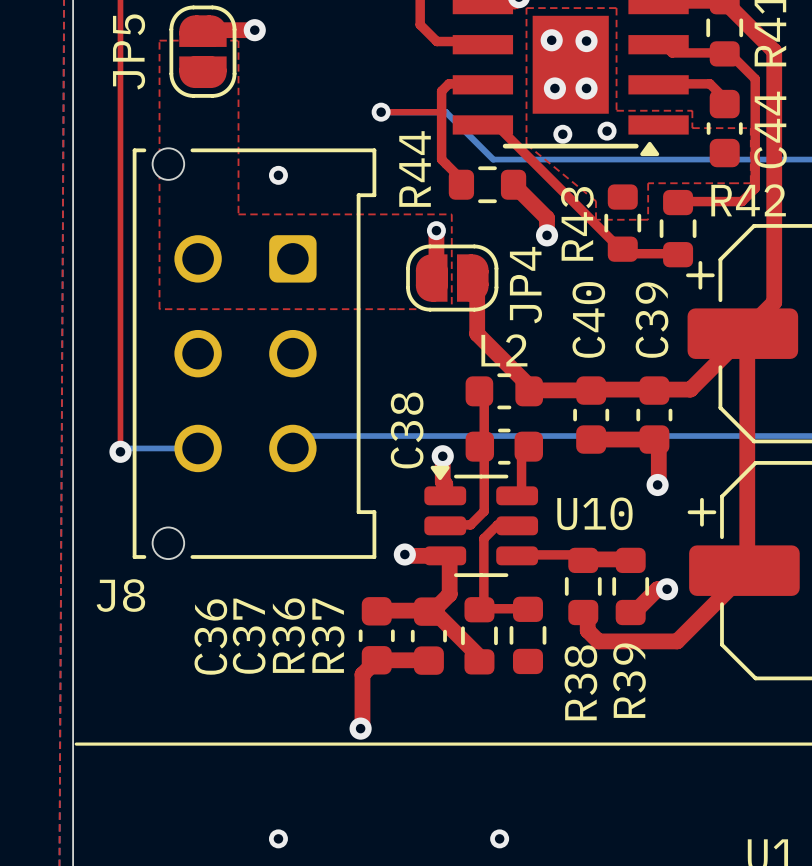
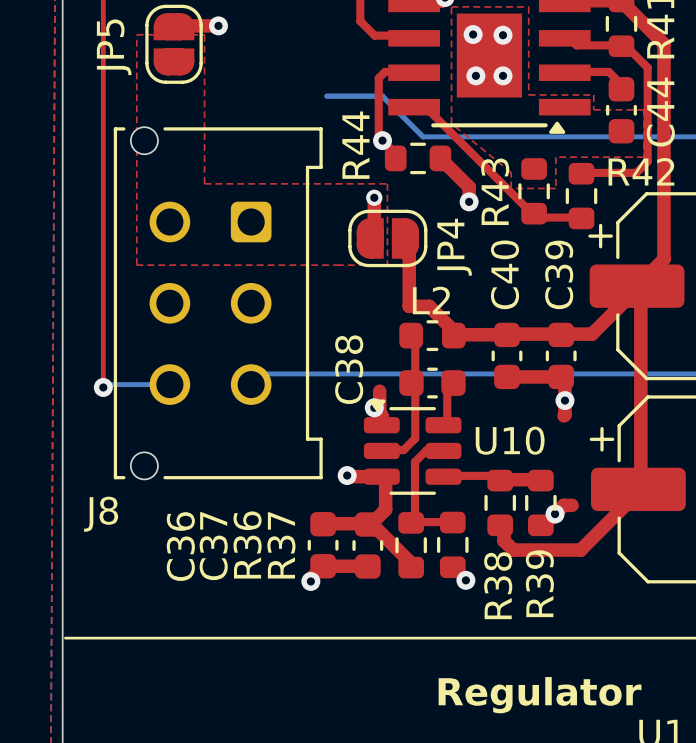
top track: (381, 112) (441, 112) -> none
via: (381, 112) -> none
via: (607, 131) -> none
via: (562, 134) -> none
via: none -> (382, 140)
via: (278, 175) -> none
top track: (477, 333) (500, 357) -> (409, 286) (409, 306) (429, 306)
via position: (442, 456) -> (374, 407)
via position: (657, 485) -> (564, 400)
via position: (667, 589) -> (555, 514)
via: none -> (465, 580)
top track: (362, 678) (362, 726) (360, 728) -> none
via position: (360, 728) -> (310, 581)
text: none -> Regulator (540, 695)
via: (278, 838) -> none
via: (499, 838) -> none

